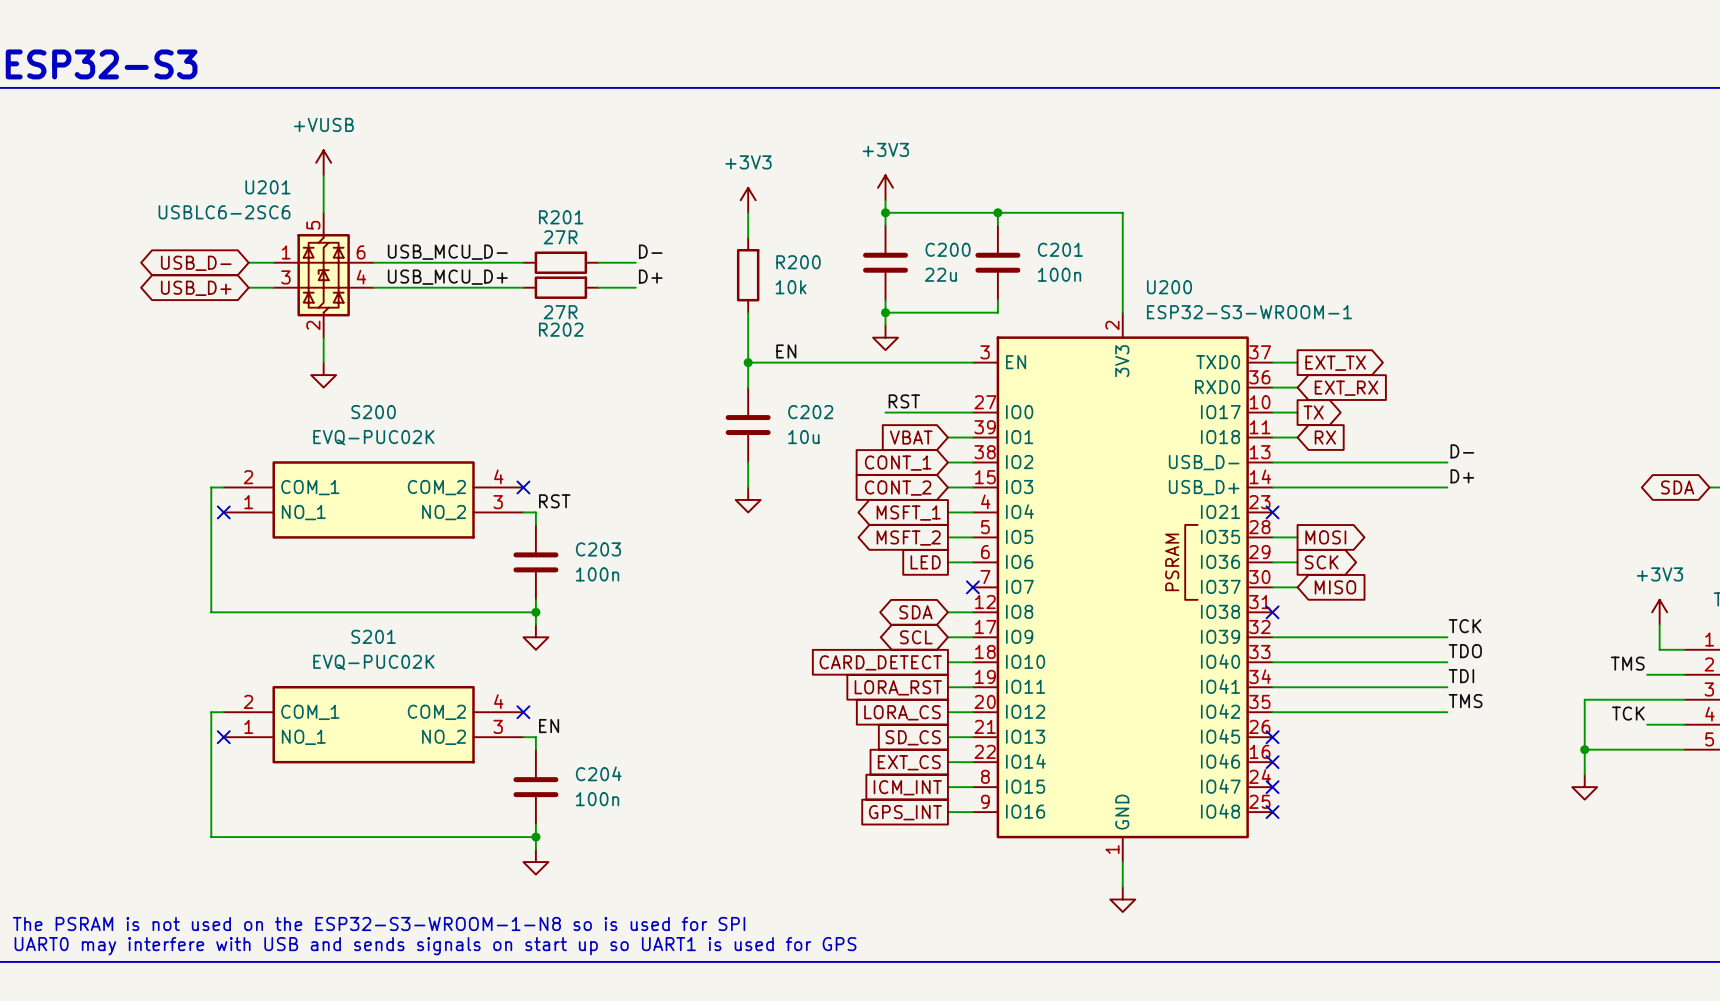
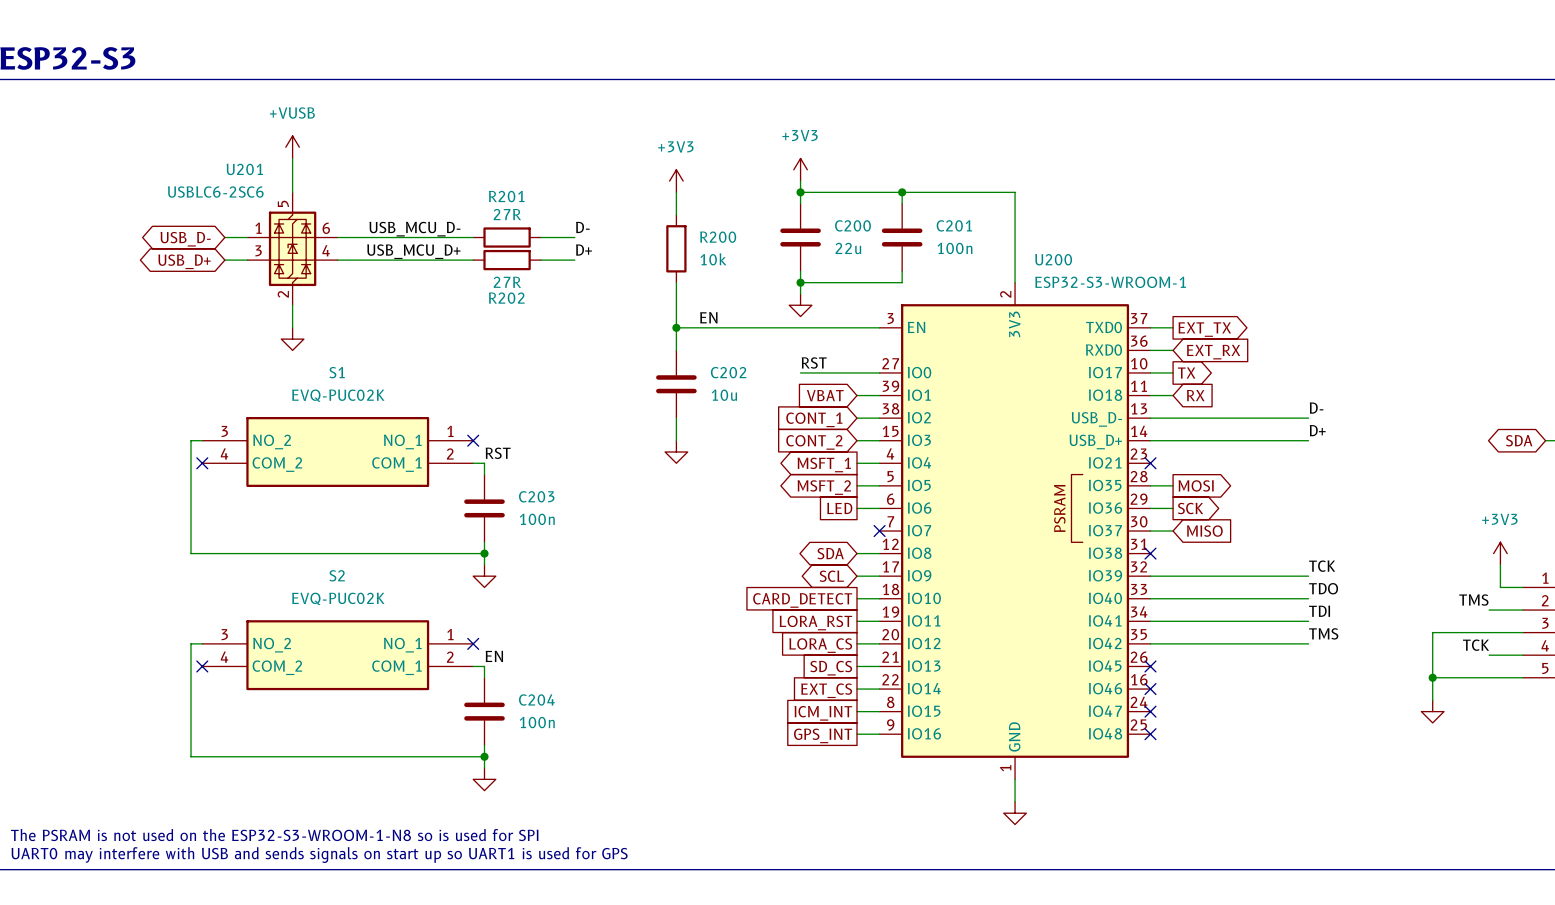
S200 name: S200 (373, 412) -> S1 (337, 372)
S200 rotation: 0° (373, 499) -> 180° (337, 451)
S201 name: S201 (373, 636) -> S2 (337, 575)
S201 rotation: 0° (373, 724) -> 180° (337, 655)

